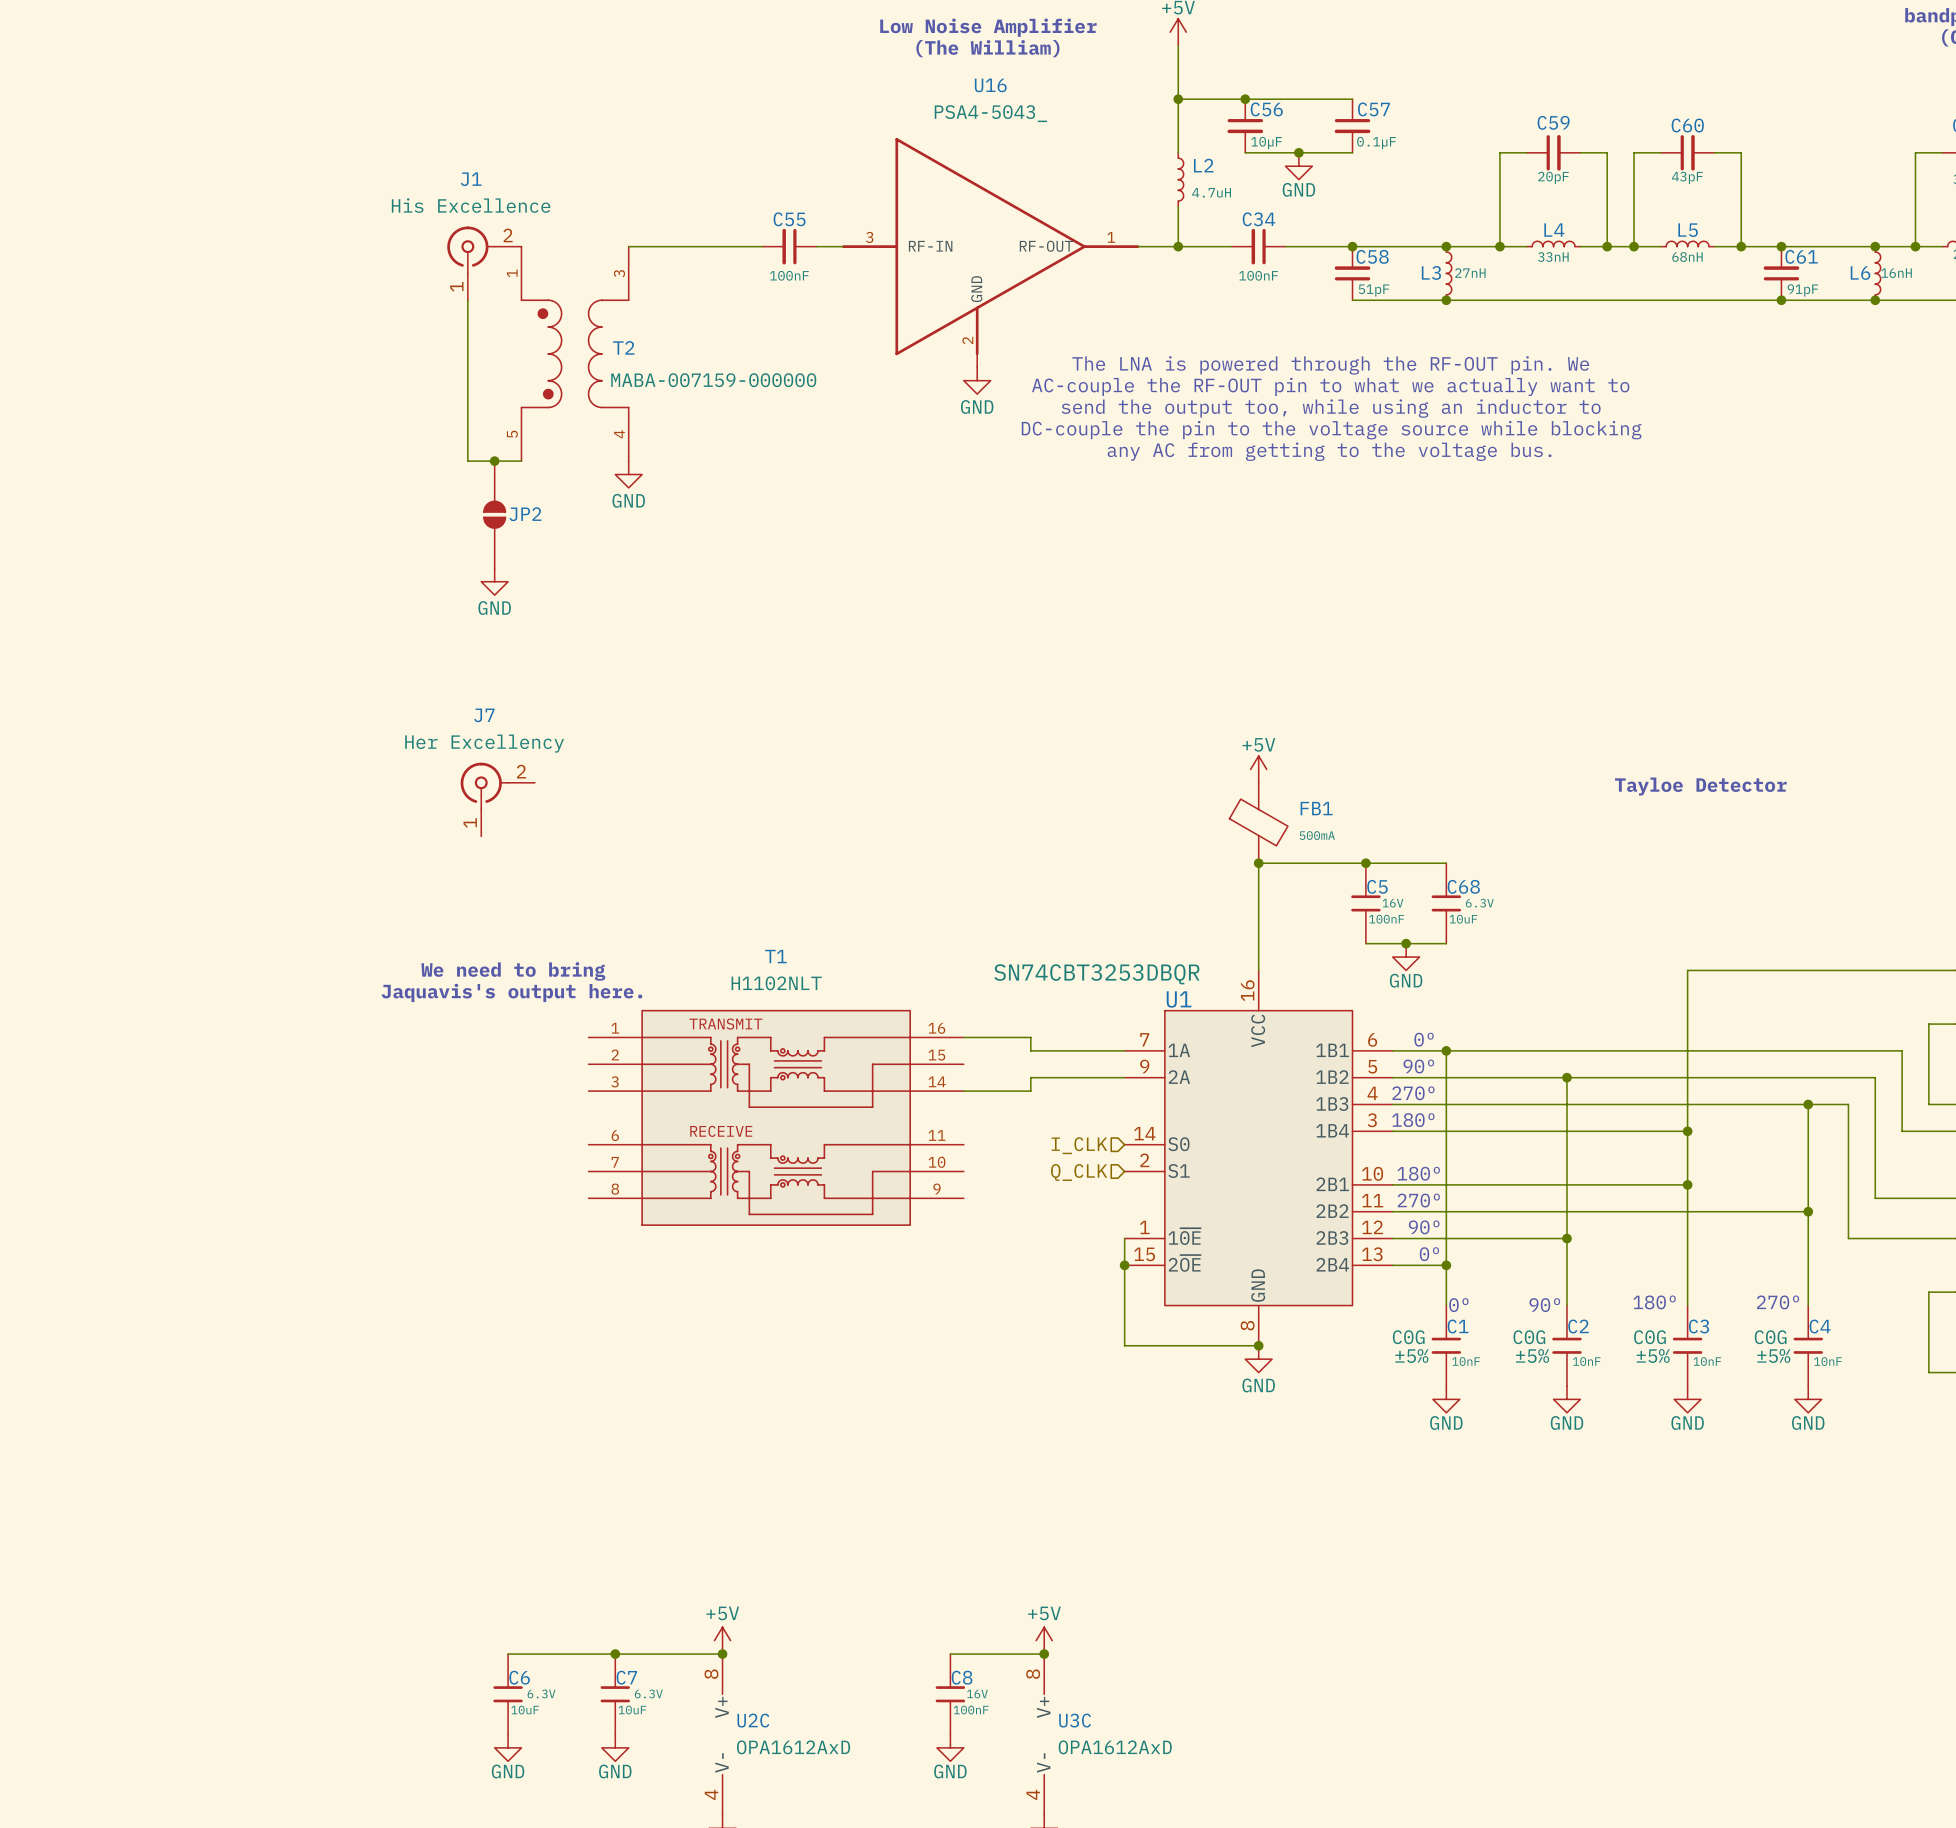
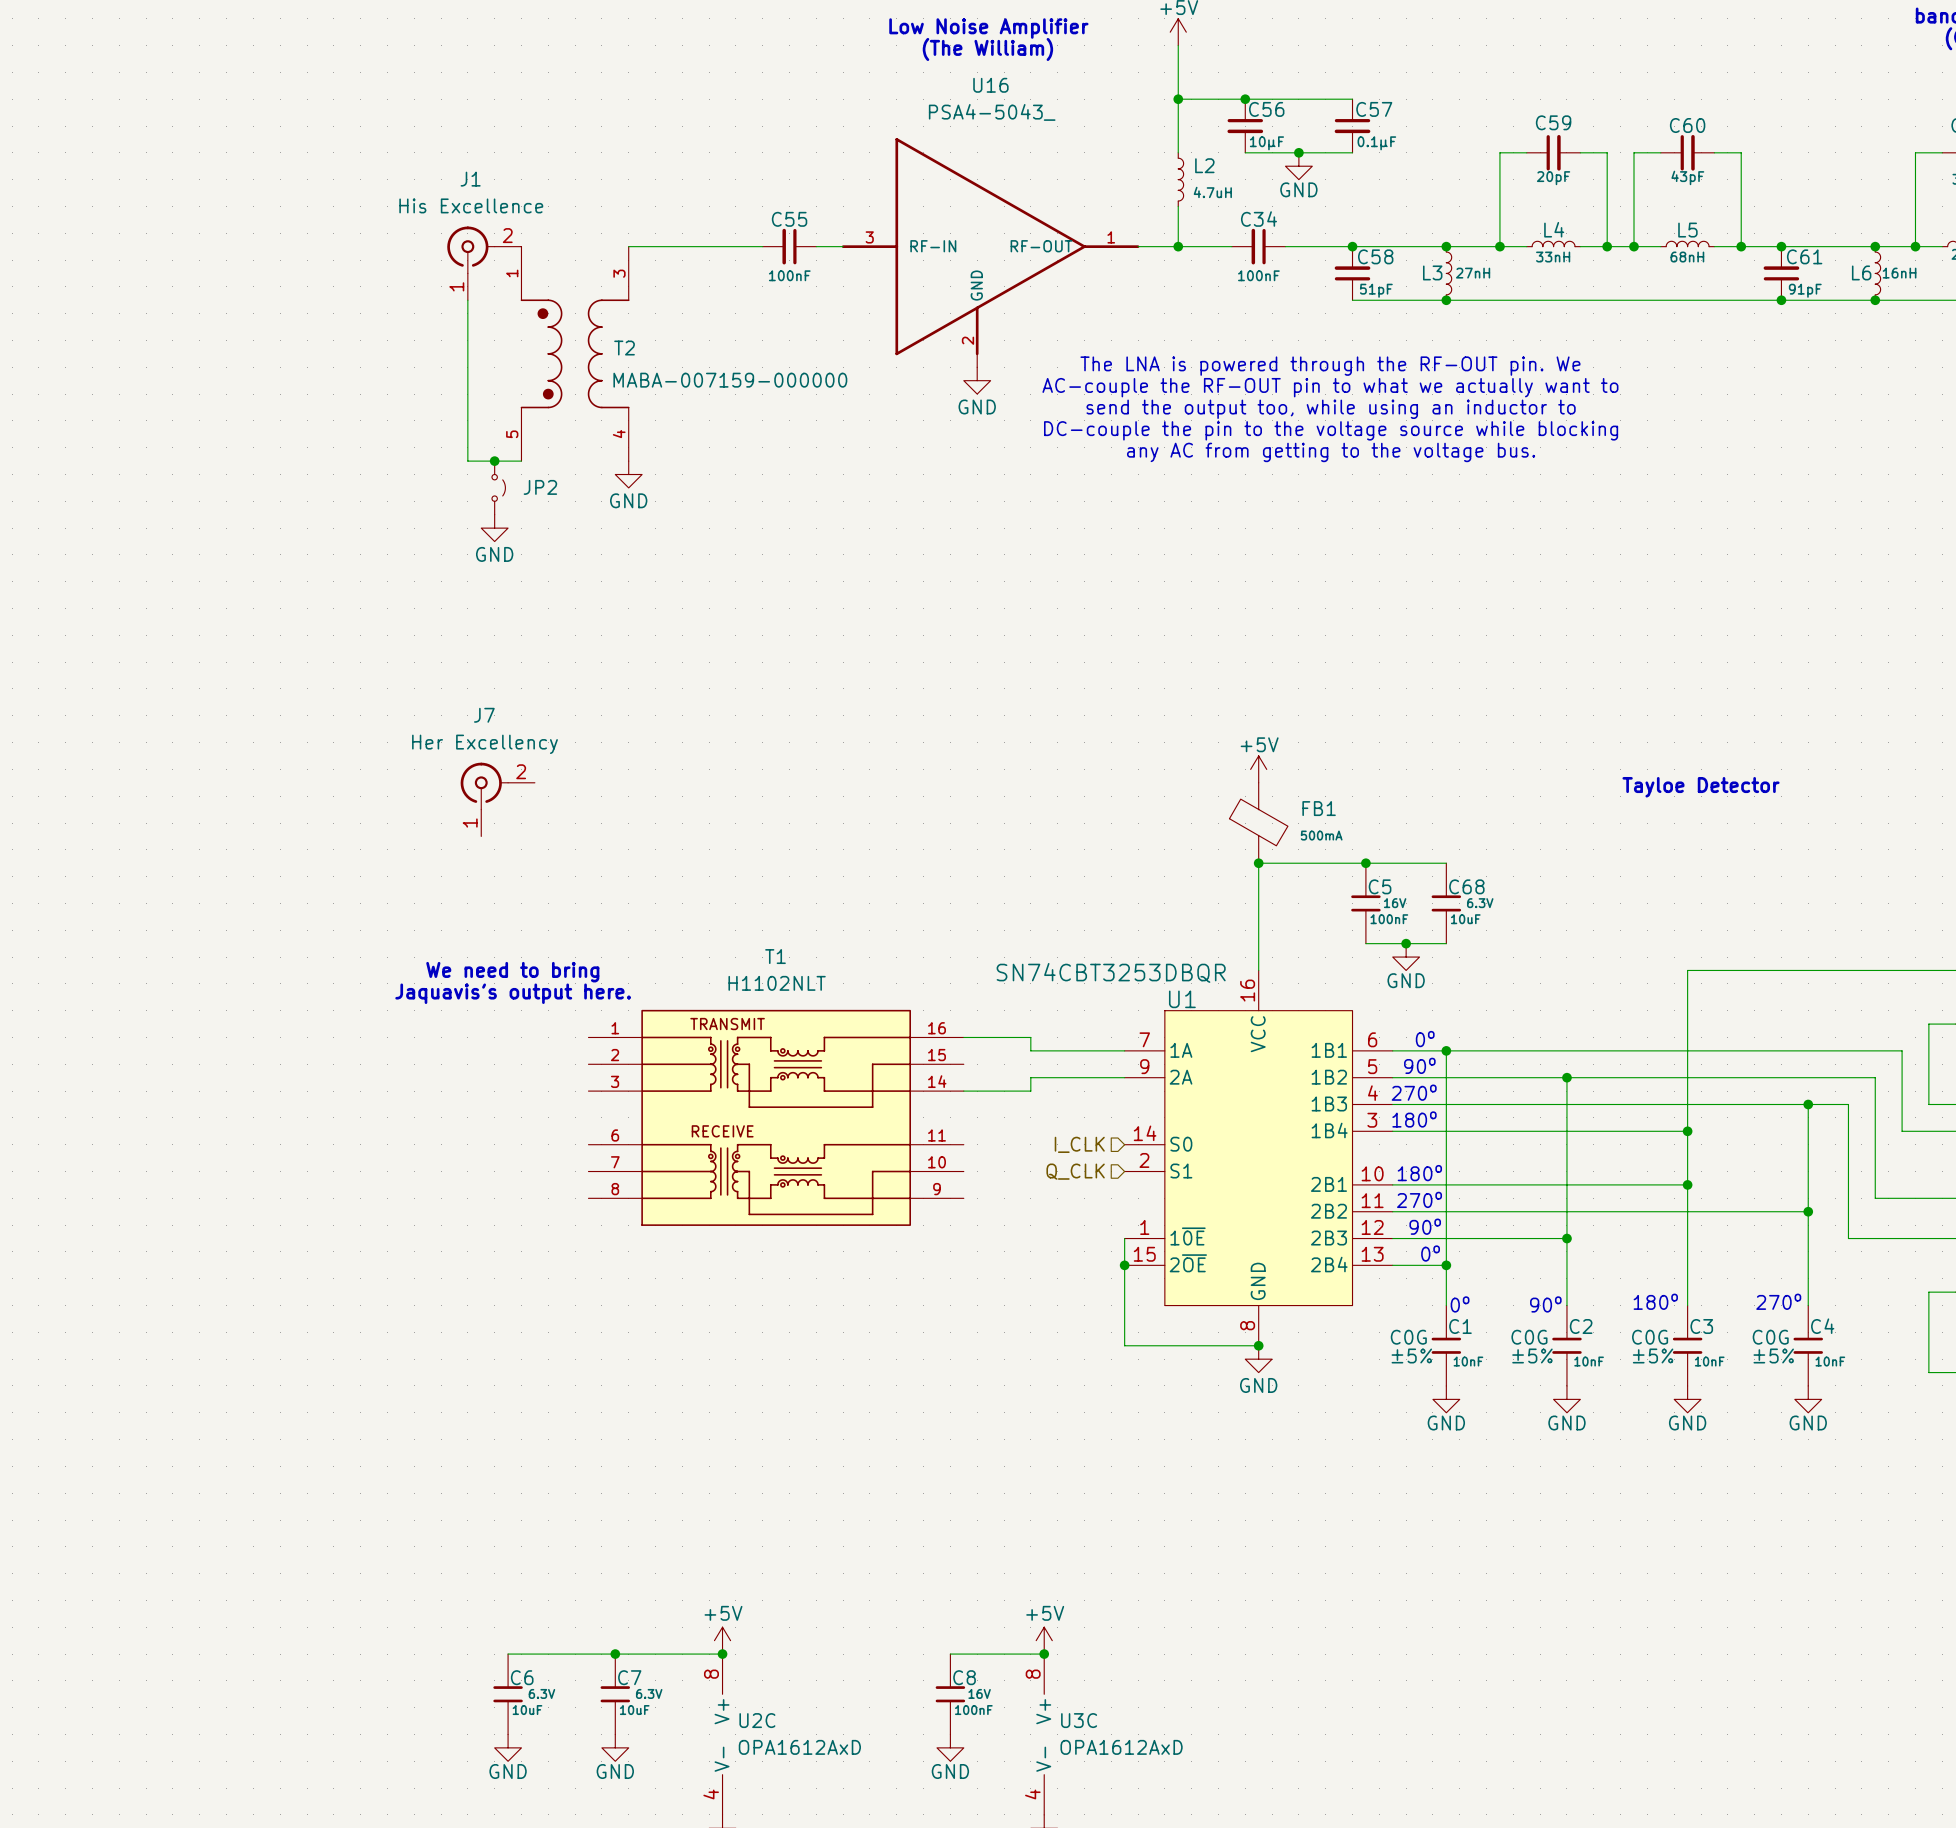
JP2 symbol: [483, 461, 507, 569] -> [491, 461, 506, 515]
power symbol position: GND (494, 581) -> GND (494, 528)

